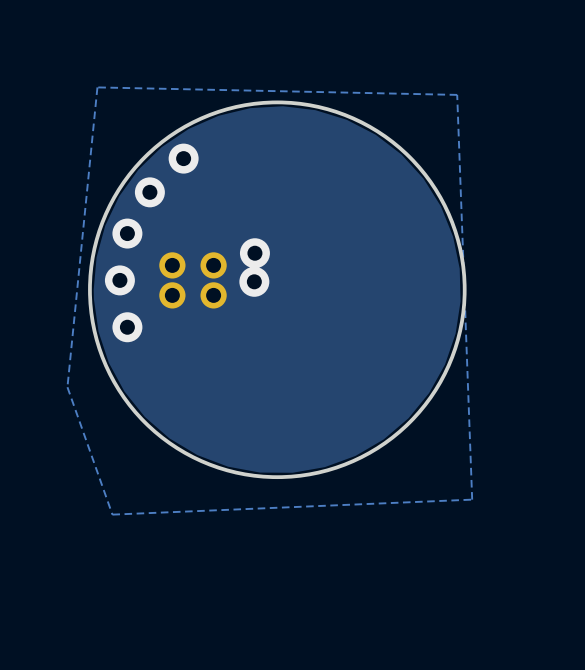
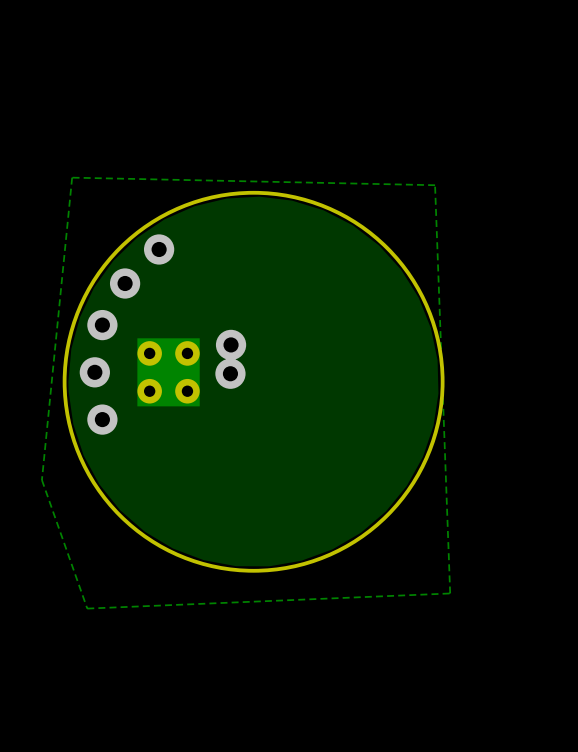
part footprint: [159, 252, 227, 309] -> [137, 338, 200, 407]

